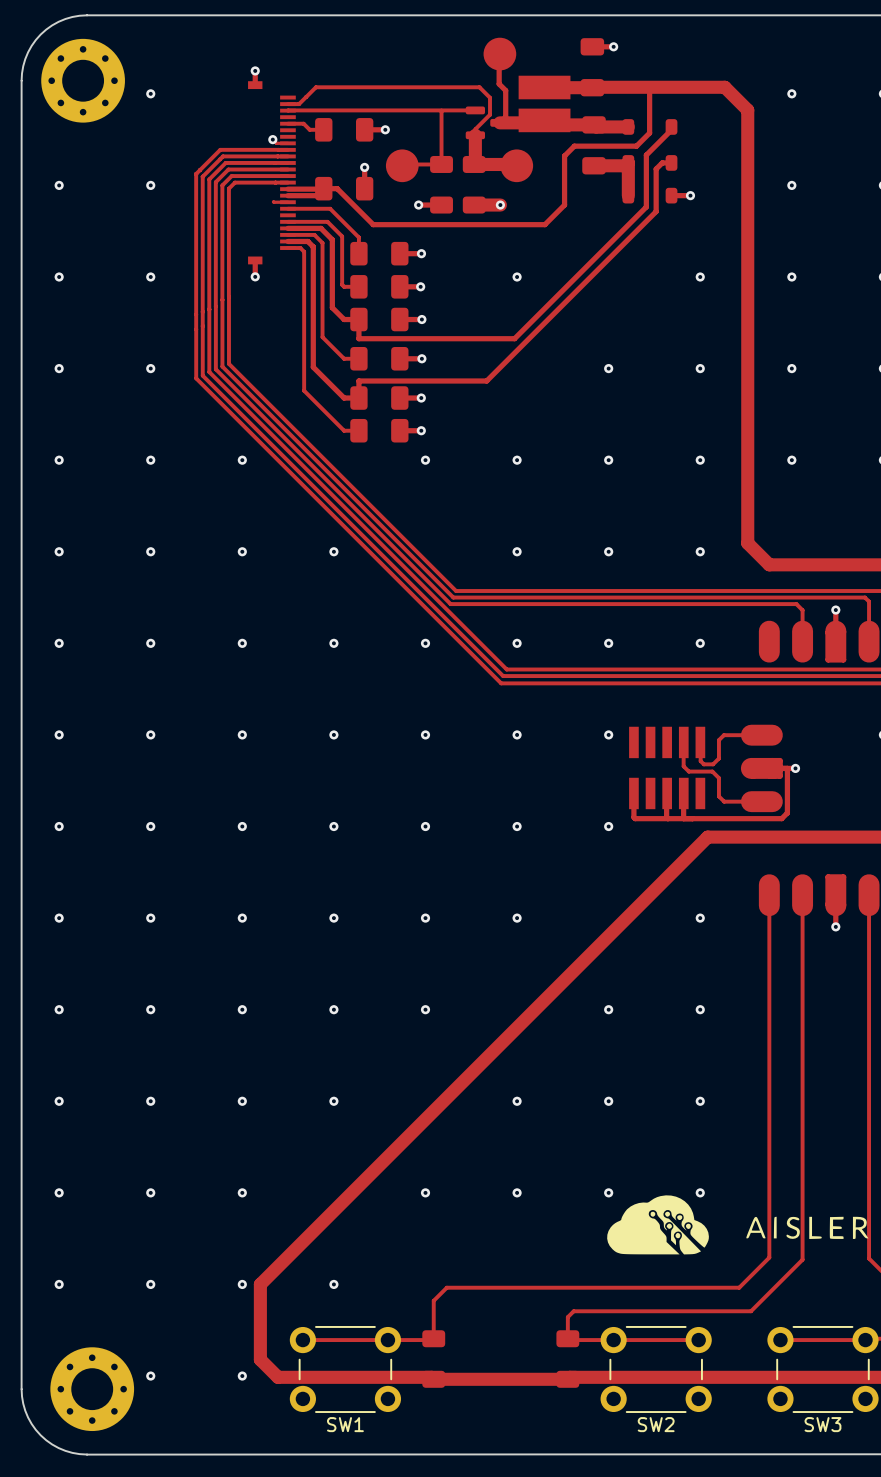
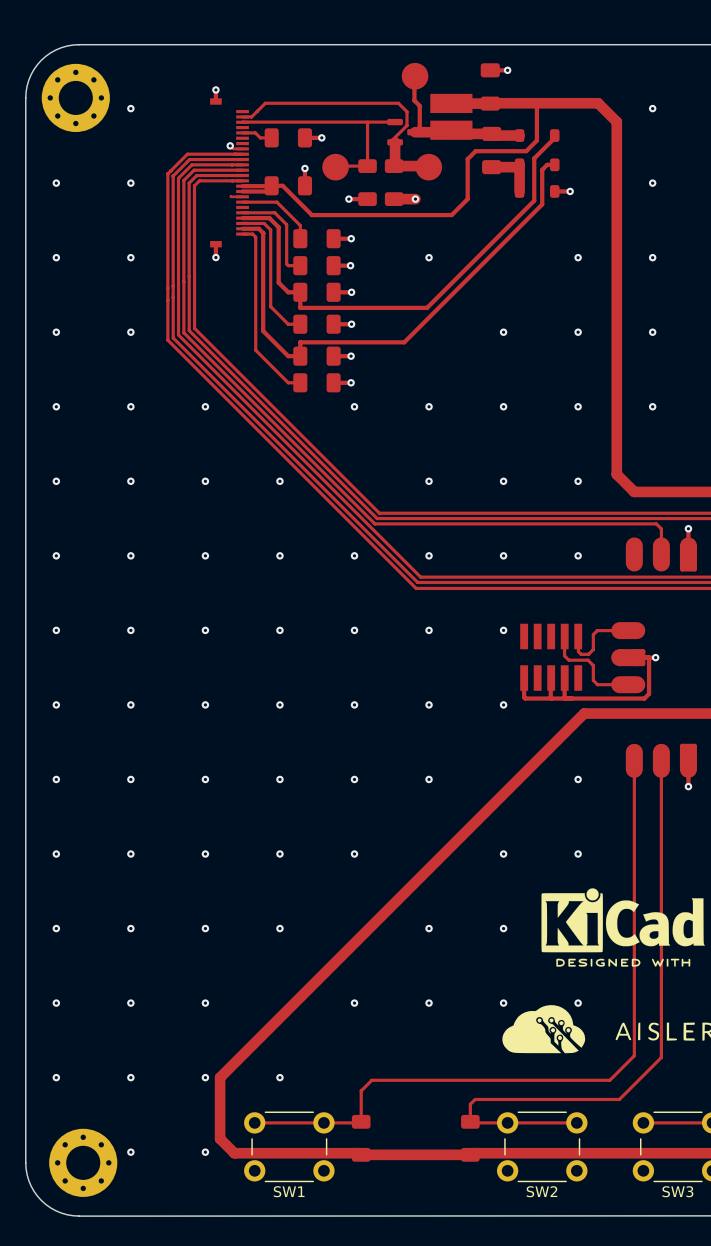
drawing: none -> [541, 888, 705, 967]

